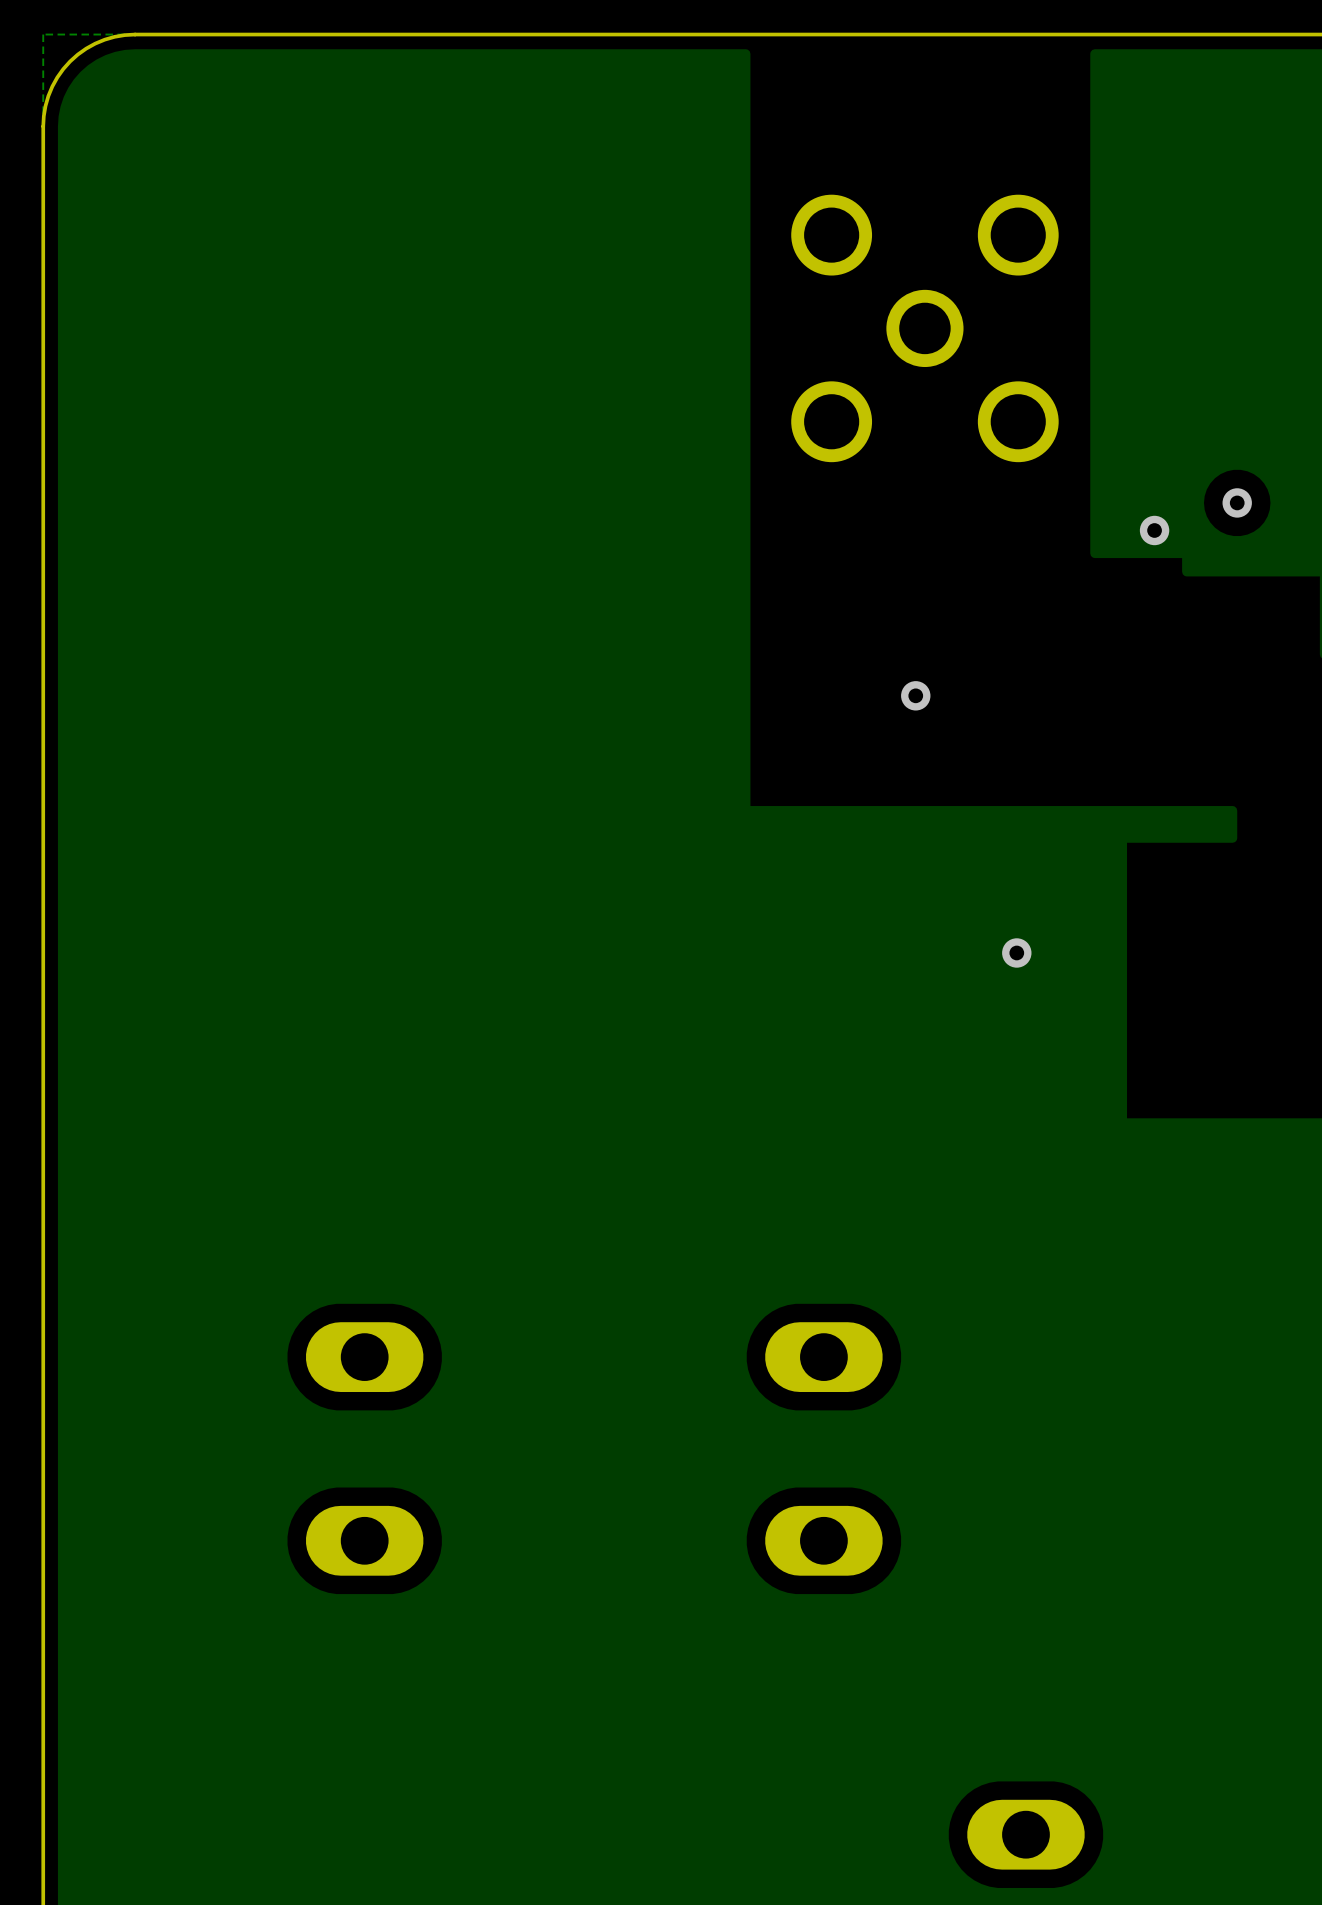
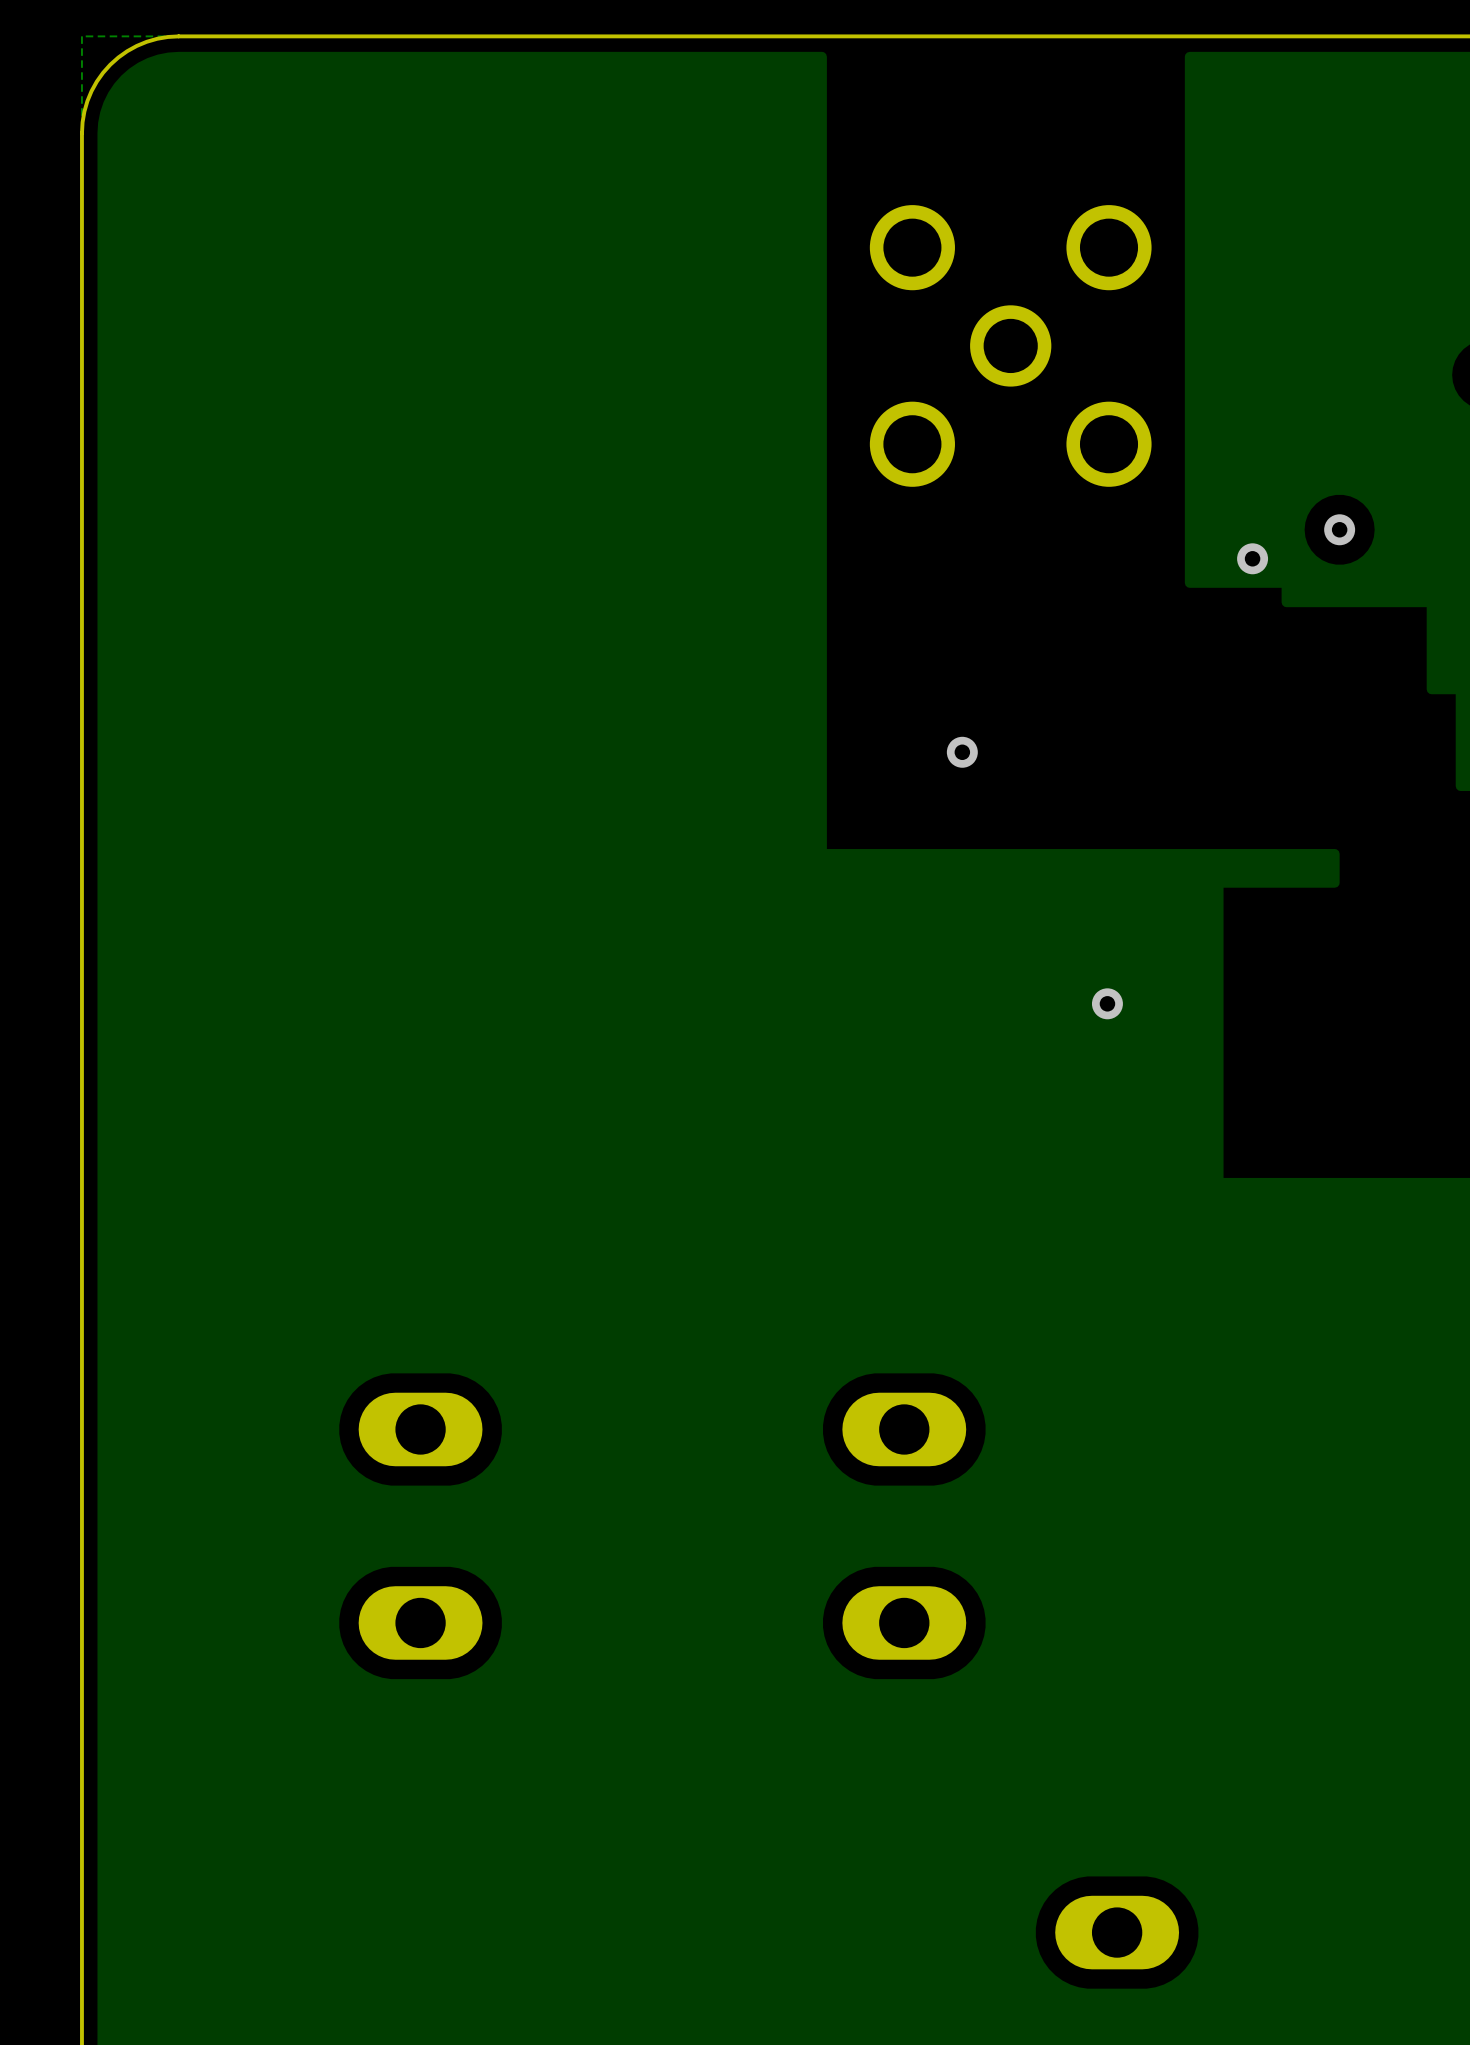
via position: (915, 695) -> (962, 752)

